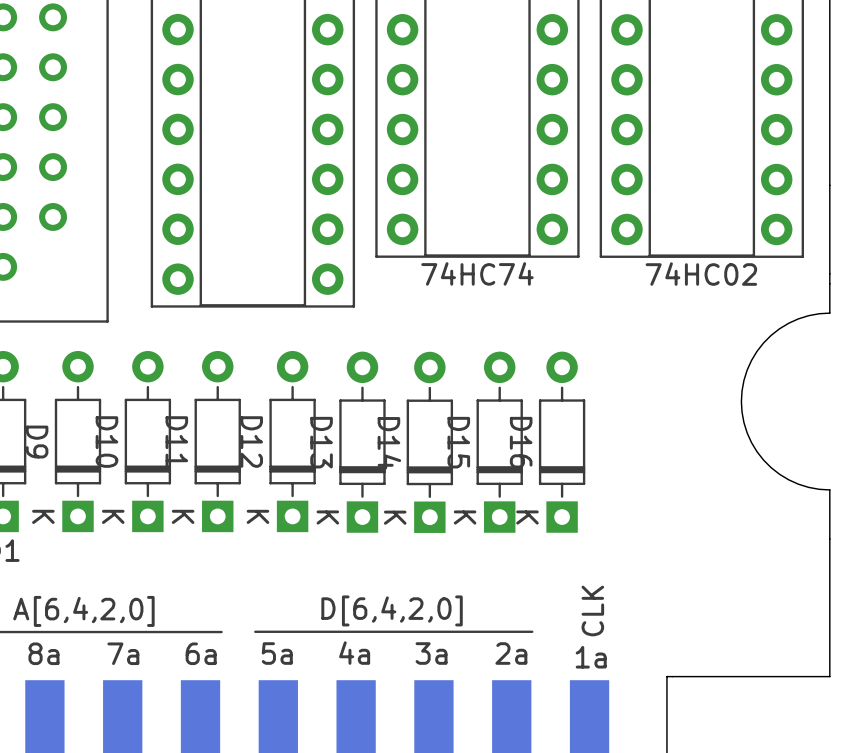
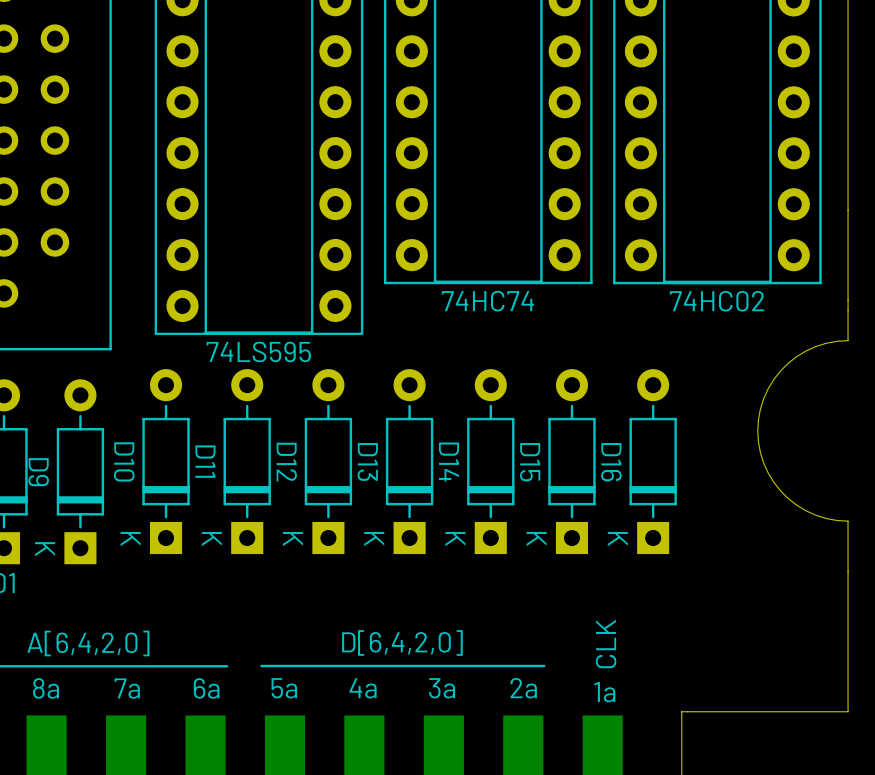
part value: none -> 74LS595 (258, 351)
D14 footprint: [406, 351, 454, 533] -> [467, 369, 515, 555]
D15 footprint: [476, 351, 523, 533] -> [548, 369, 596, 555]
D10 position: (147, 441) -> (166, 461)
D11 position: (217, 441) -> (247, 461)
D12 position: (292, 441) -> (328, 461)
D13 position: (362, 442) -> (409, 461)
D16 position: (562, 442) -> (653, 461)

